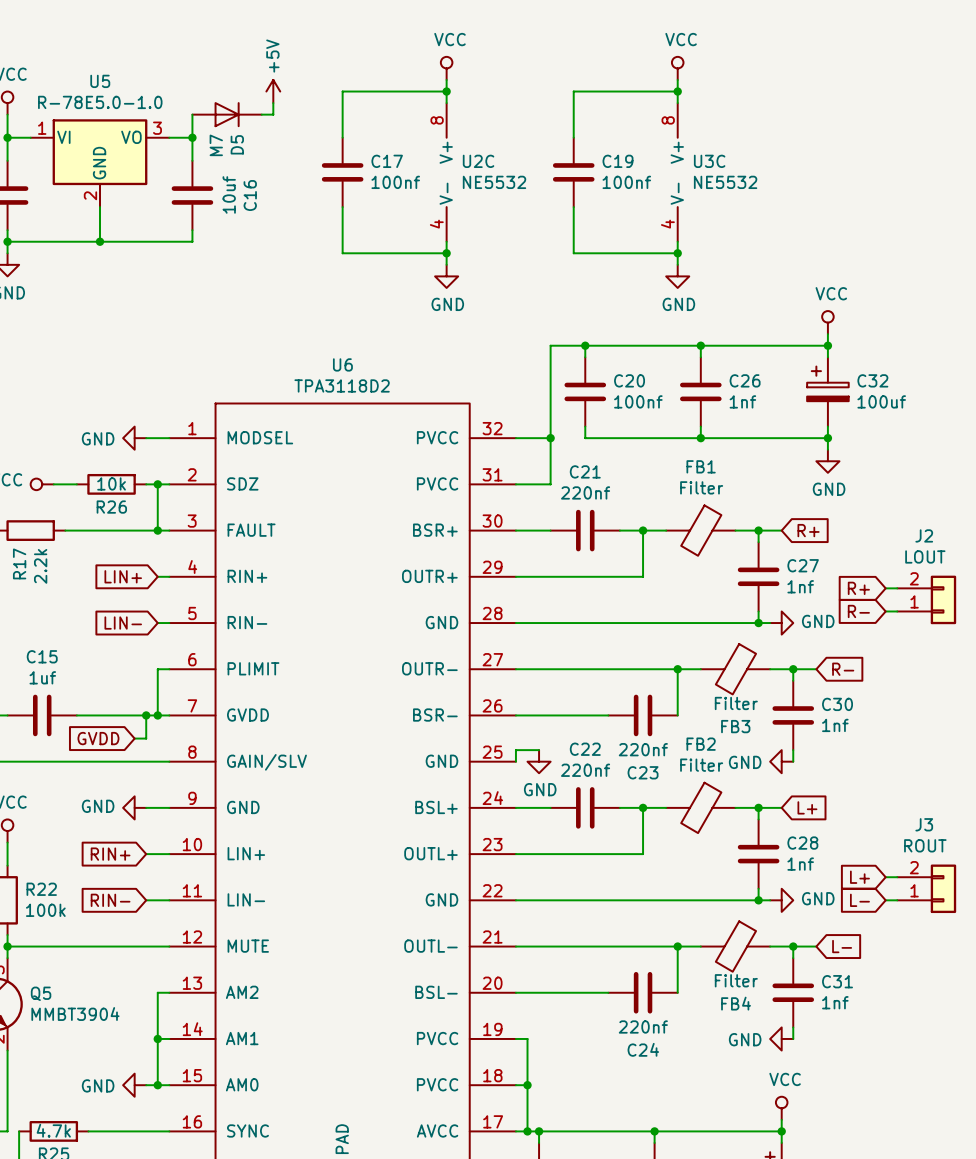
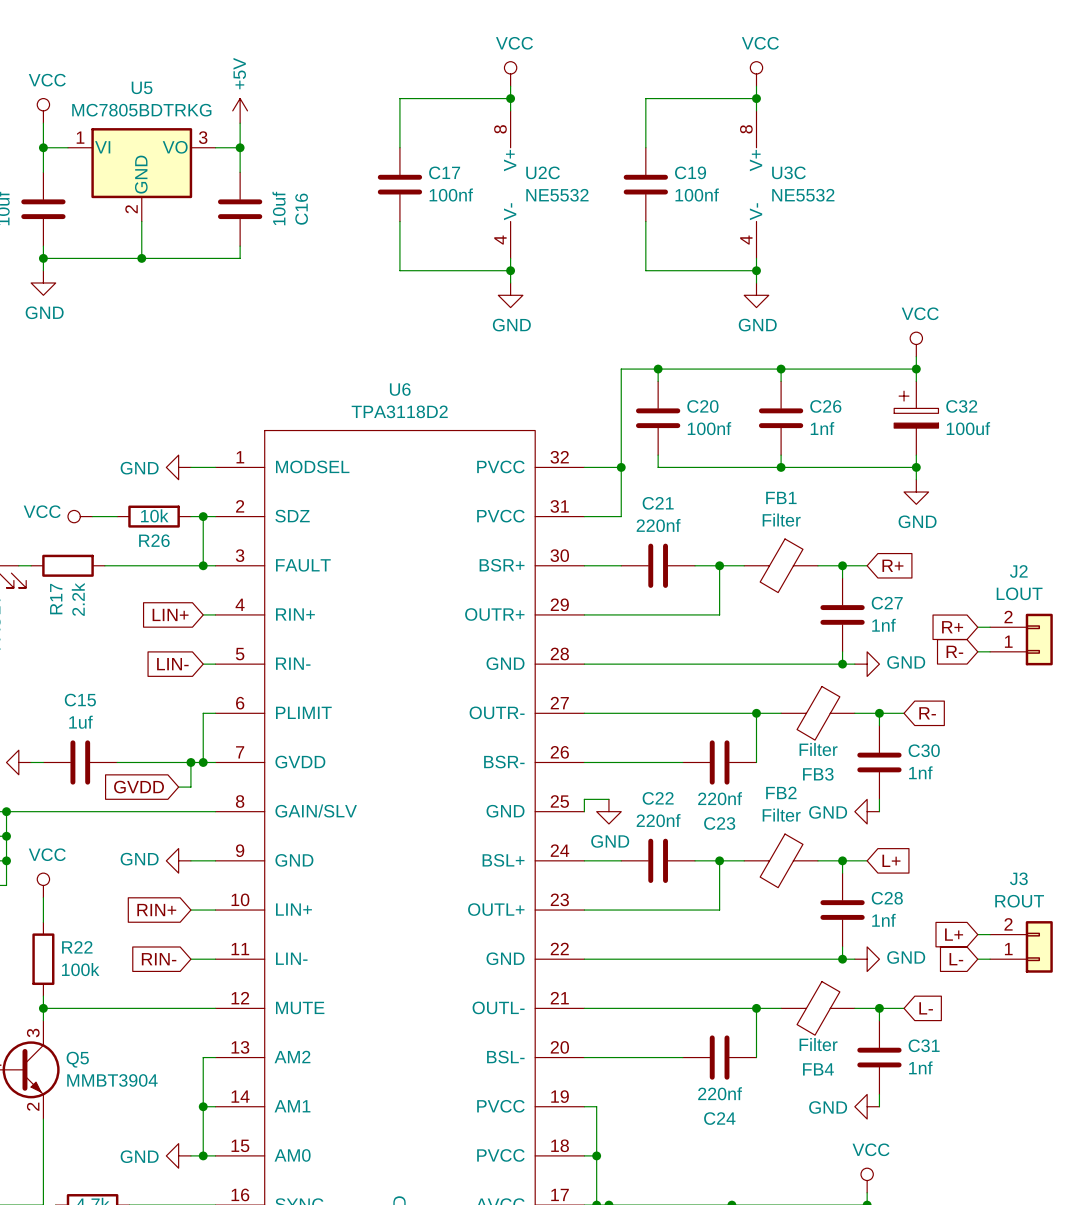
power symbol position: +5V (273, 91) -> +5V (240, 110)
U5 value: R-78E5.0-1.0 (100, 102) -> MC7805BDTRKG (141, 110)
wire: (273, 103) (273, 114) (261, 114) -> none
D5: M7 (227, 114) -> none

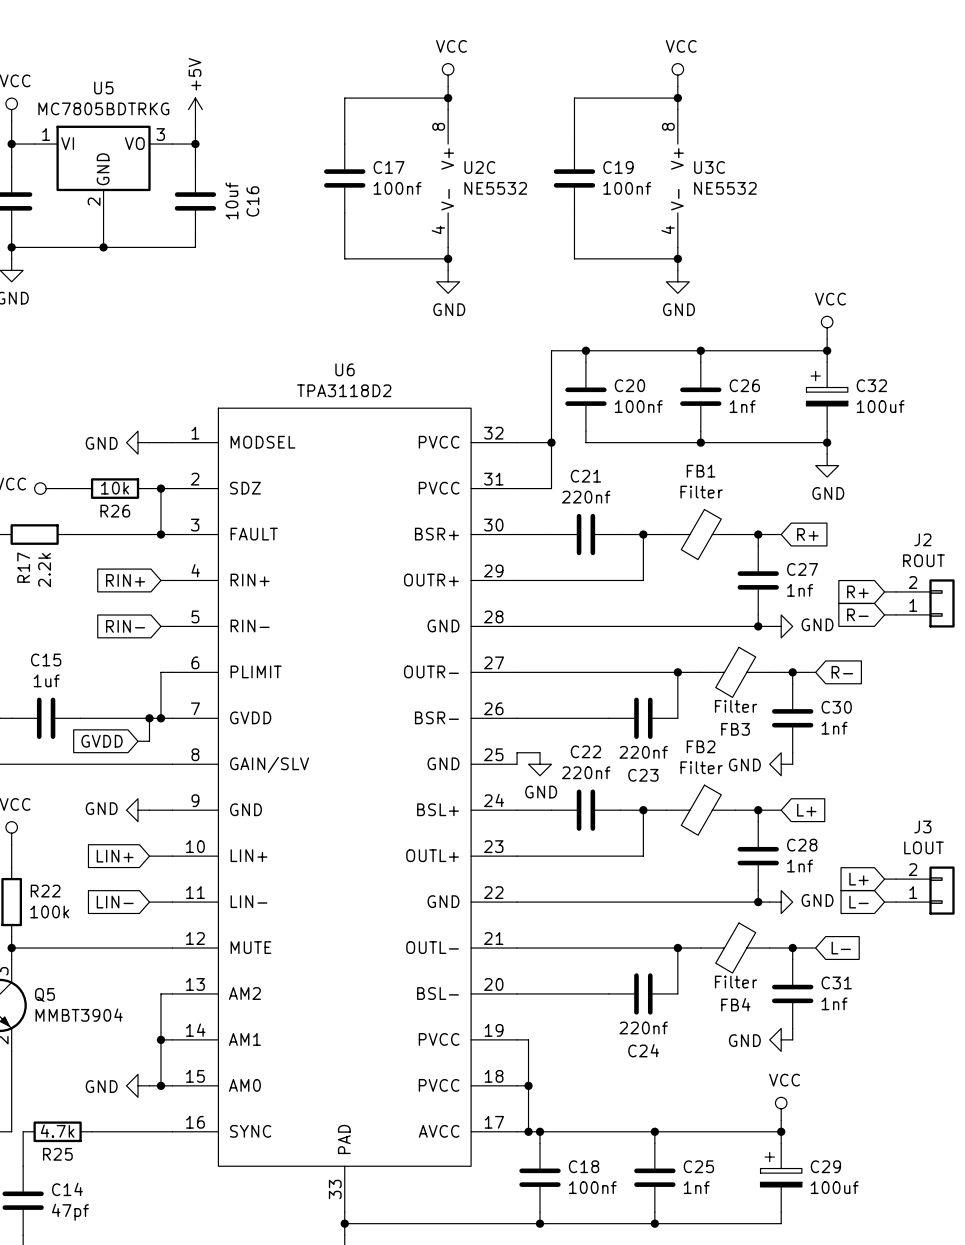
J2 value: LOUT (1019, 593) -> ROUT (923, 560)
global label: LIN+ (170, 614) -> RIN+ (125, 580)
global label: LIN- (172, 664) -> RIN- (125, 626)
J3 value: ROUT (1019, 901) -> LOUT (923, 847)
global label: RIN+ (156, 910) -> LIN+ (115, 856)
global label: RIN- (159, 959) -> LIN- (115, 902)

